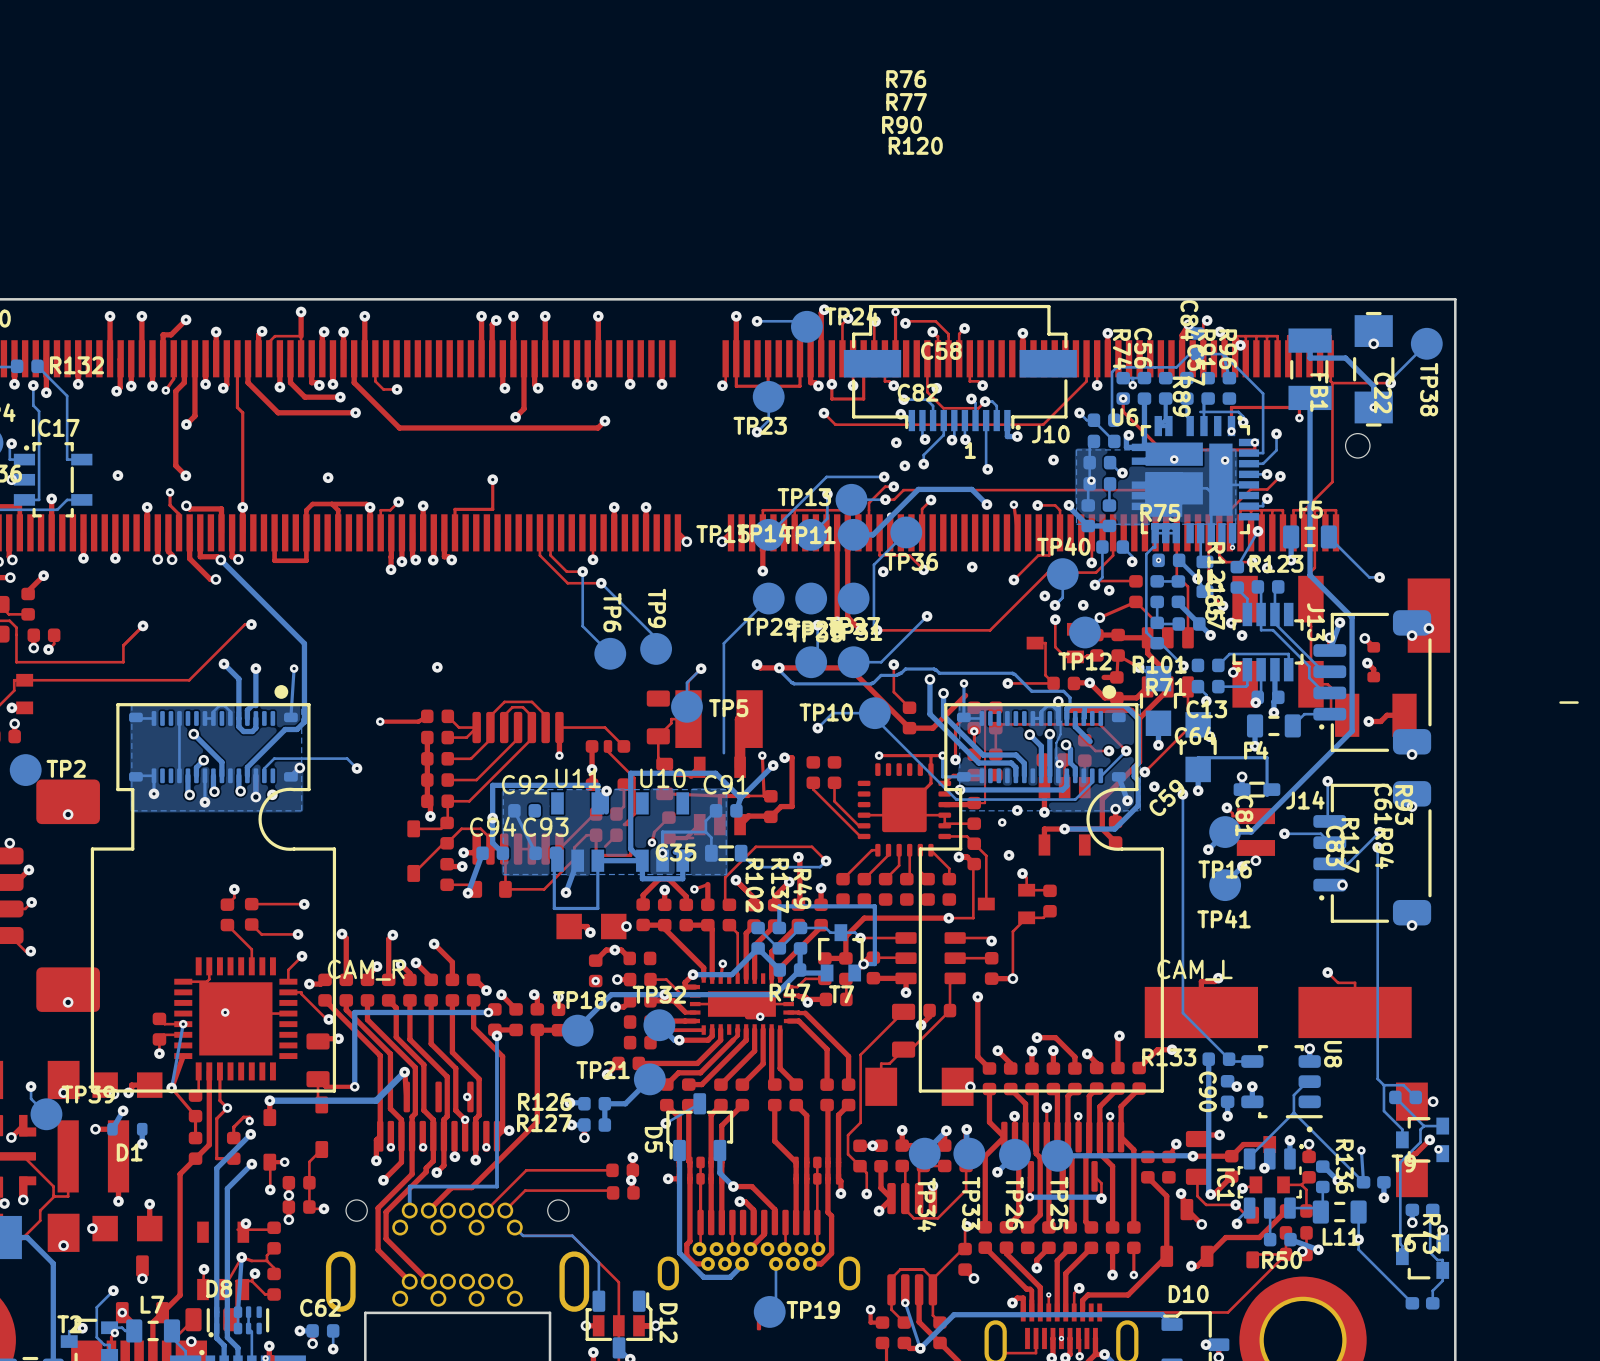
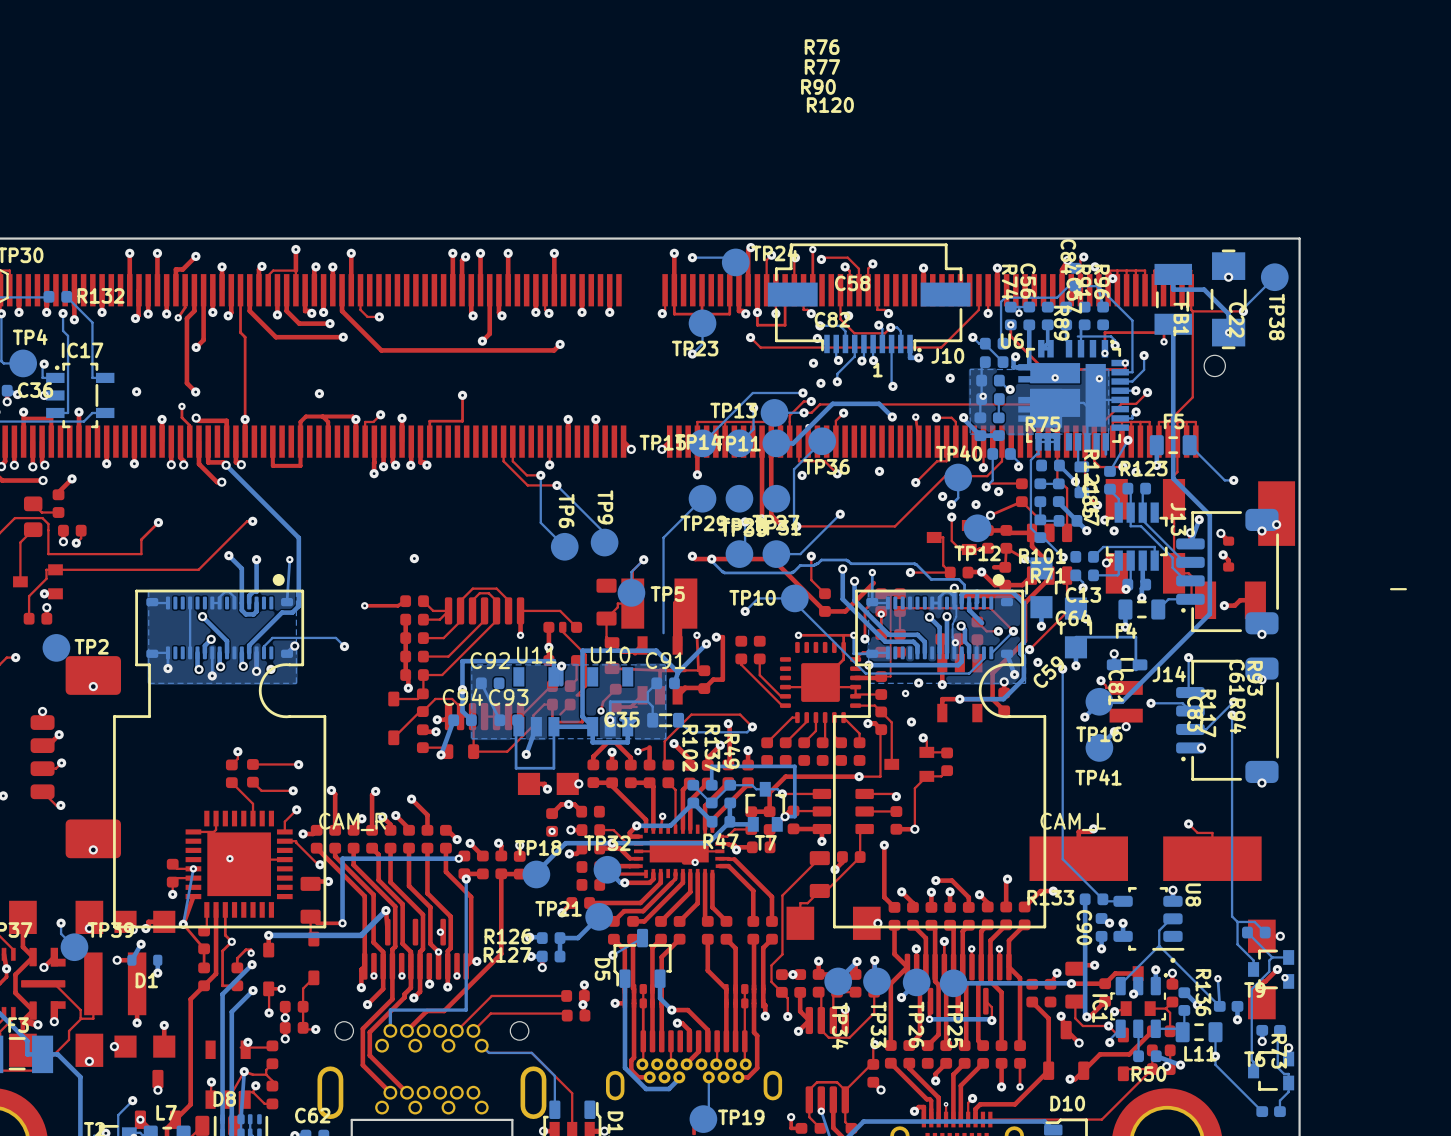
via: (1232, 547) -> none
via: (1158, 560) -> none

